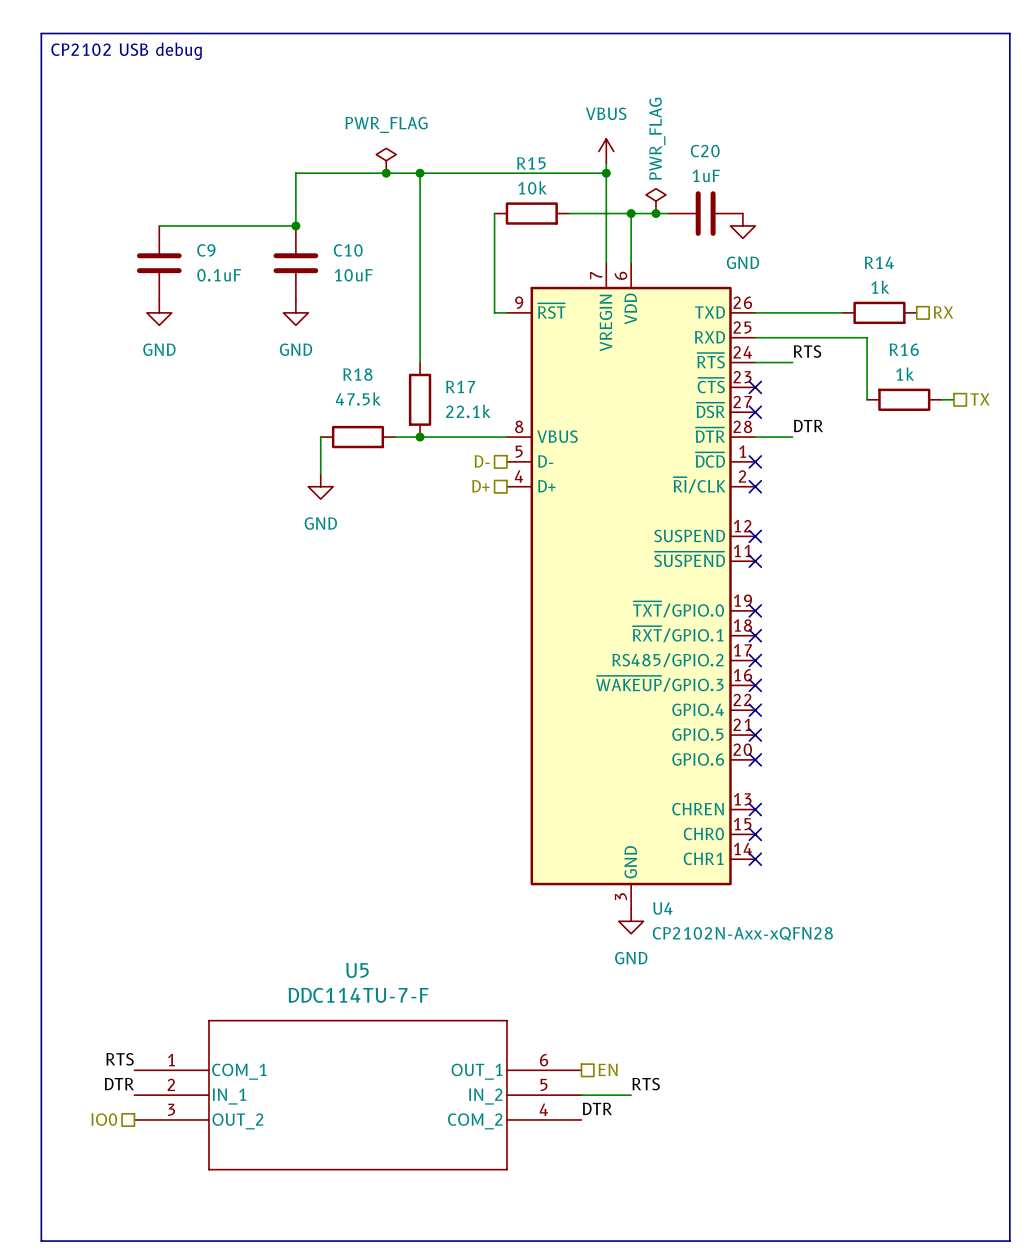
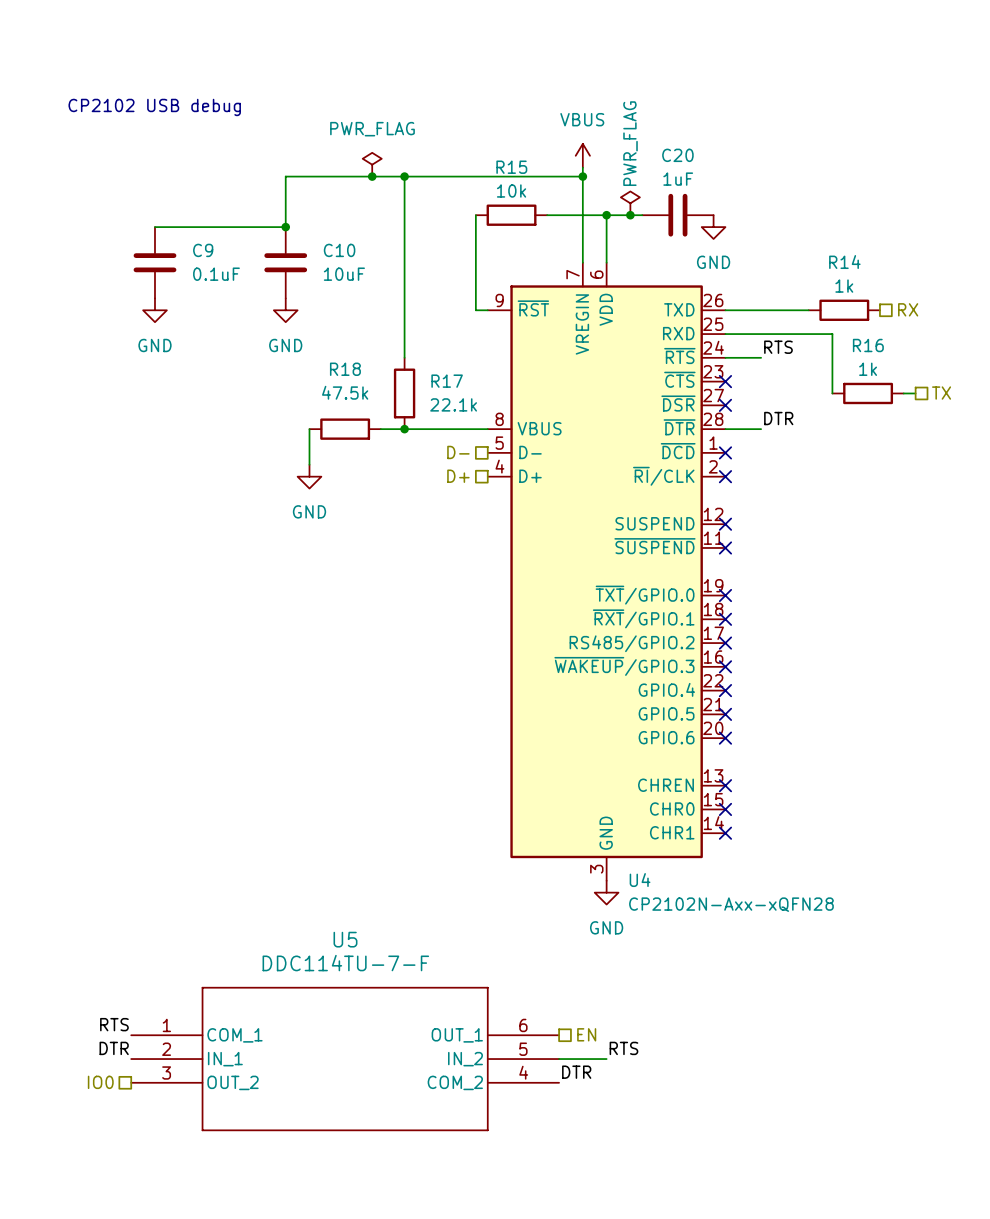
line: (41, 33) (1009, 33) (1009, 1241) (41, 1241) (41, 33) -> none
text position: CP2102 USB debug (126, 51) -> CP2102 USB debug (154, 107)

